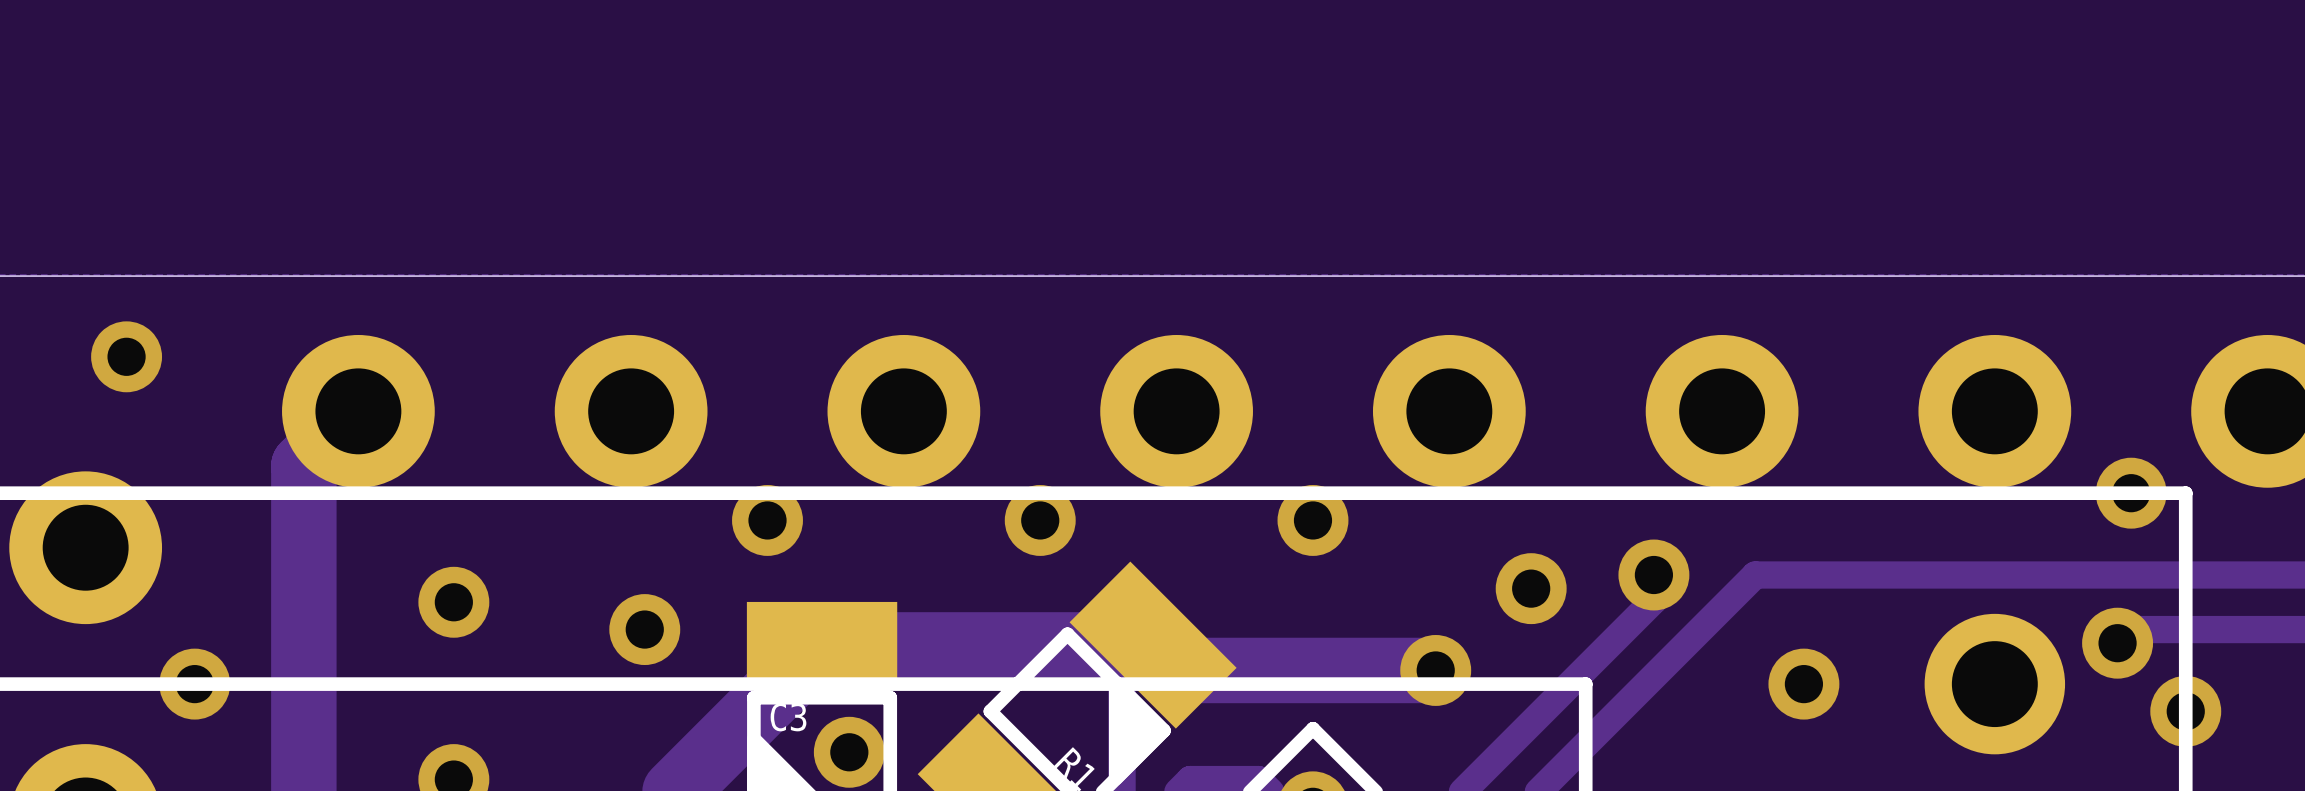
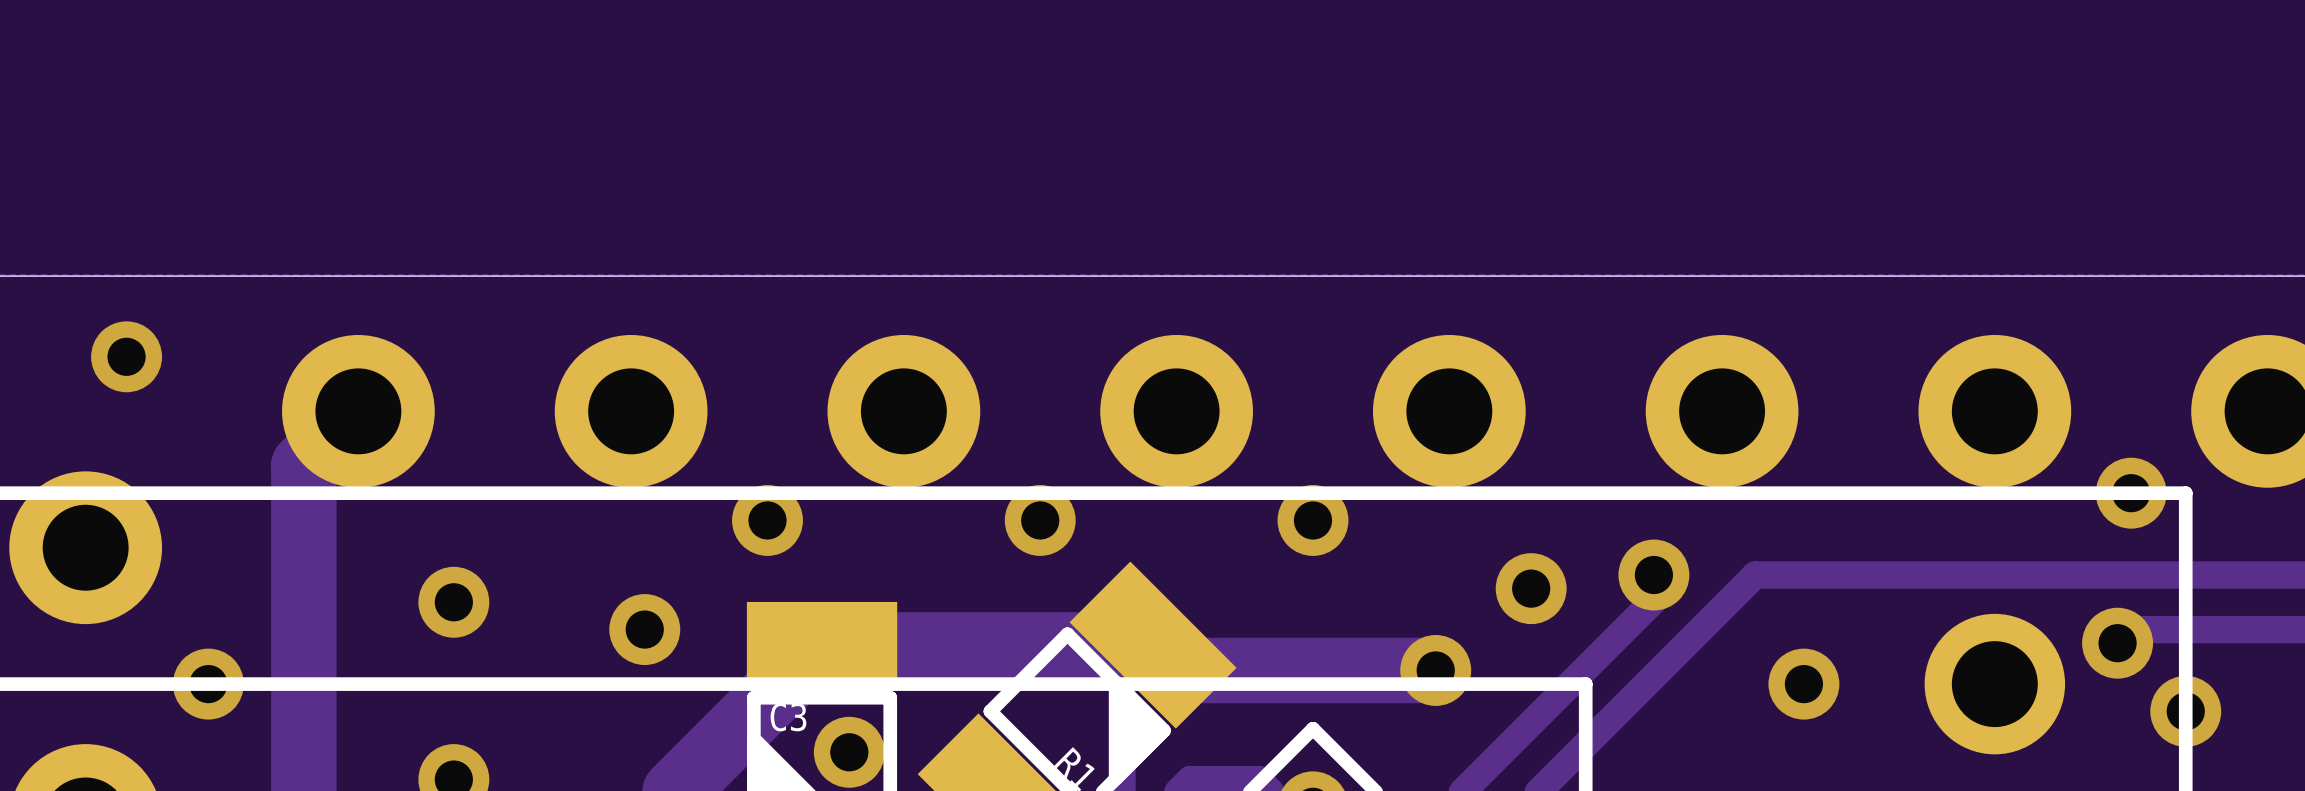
via position: (194, 684) -> (208, 684)

